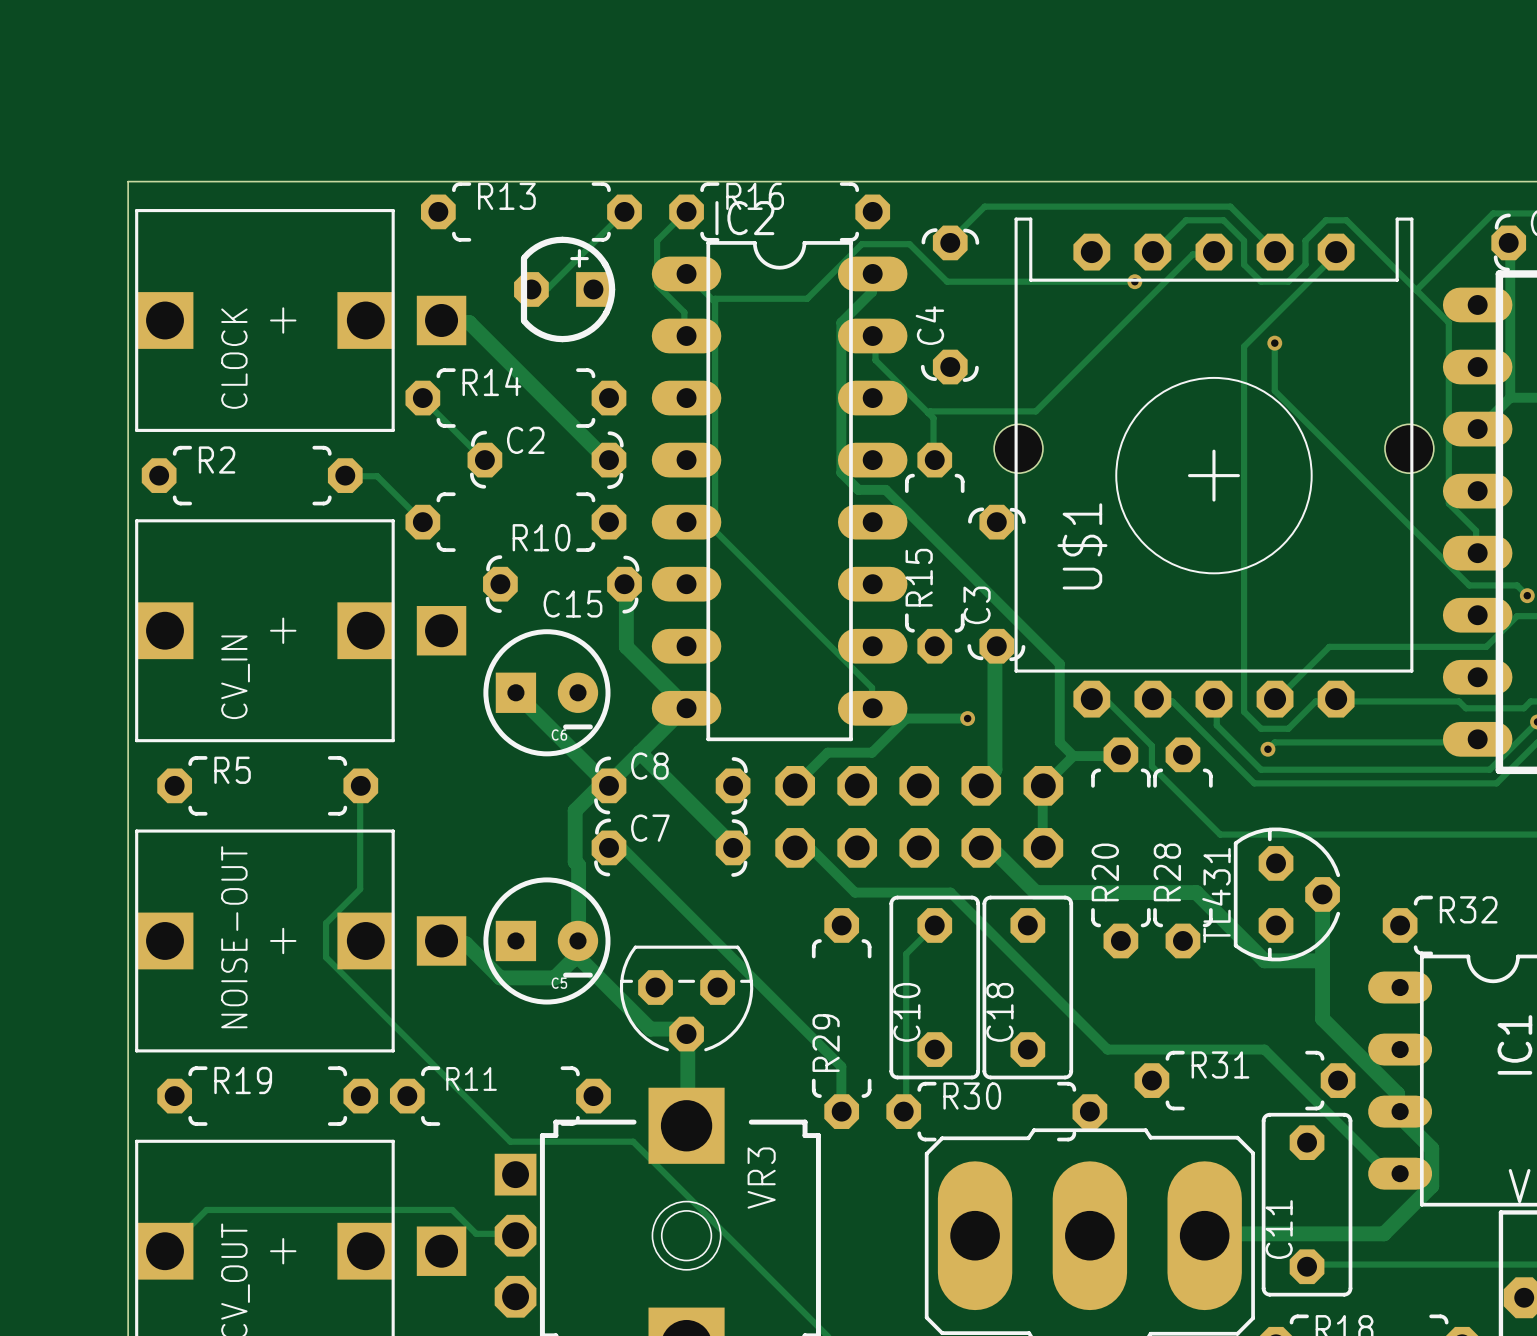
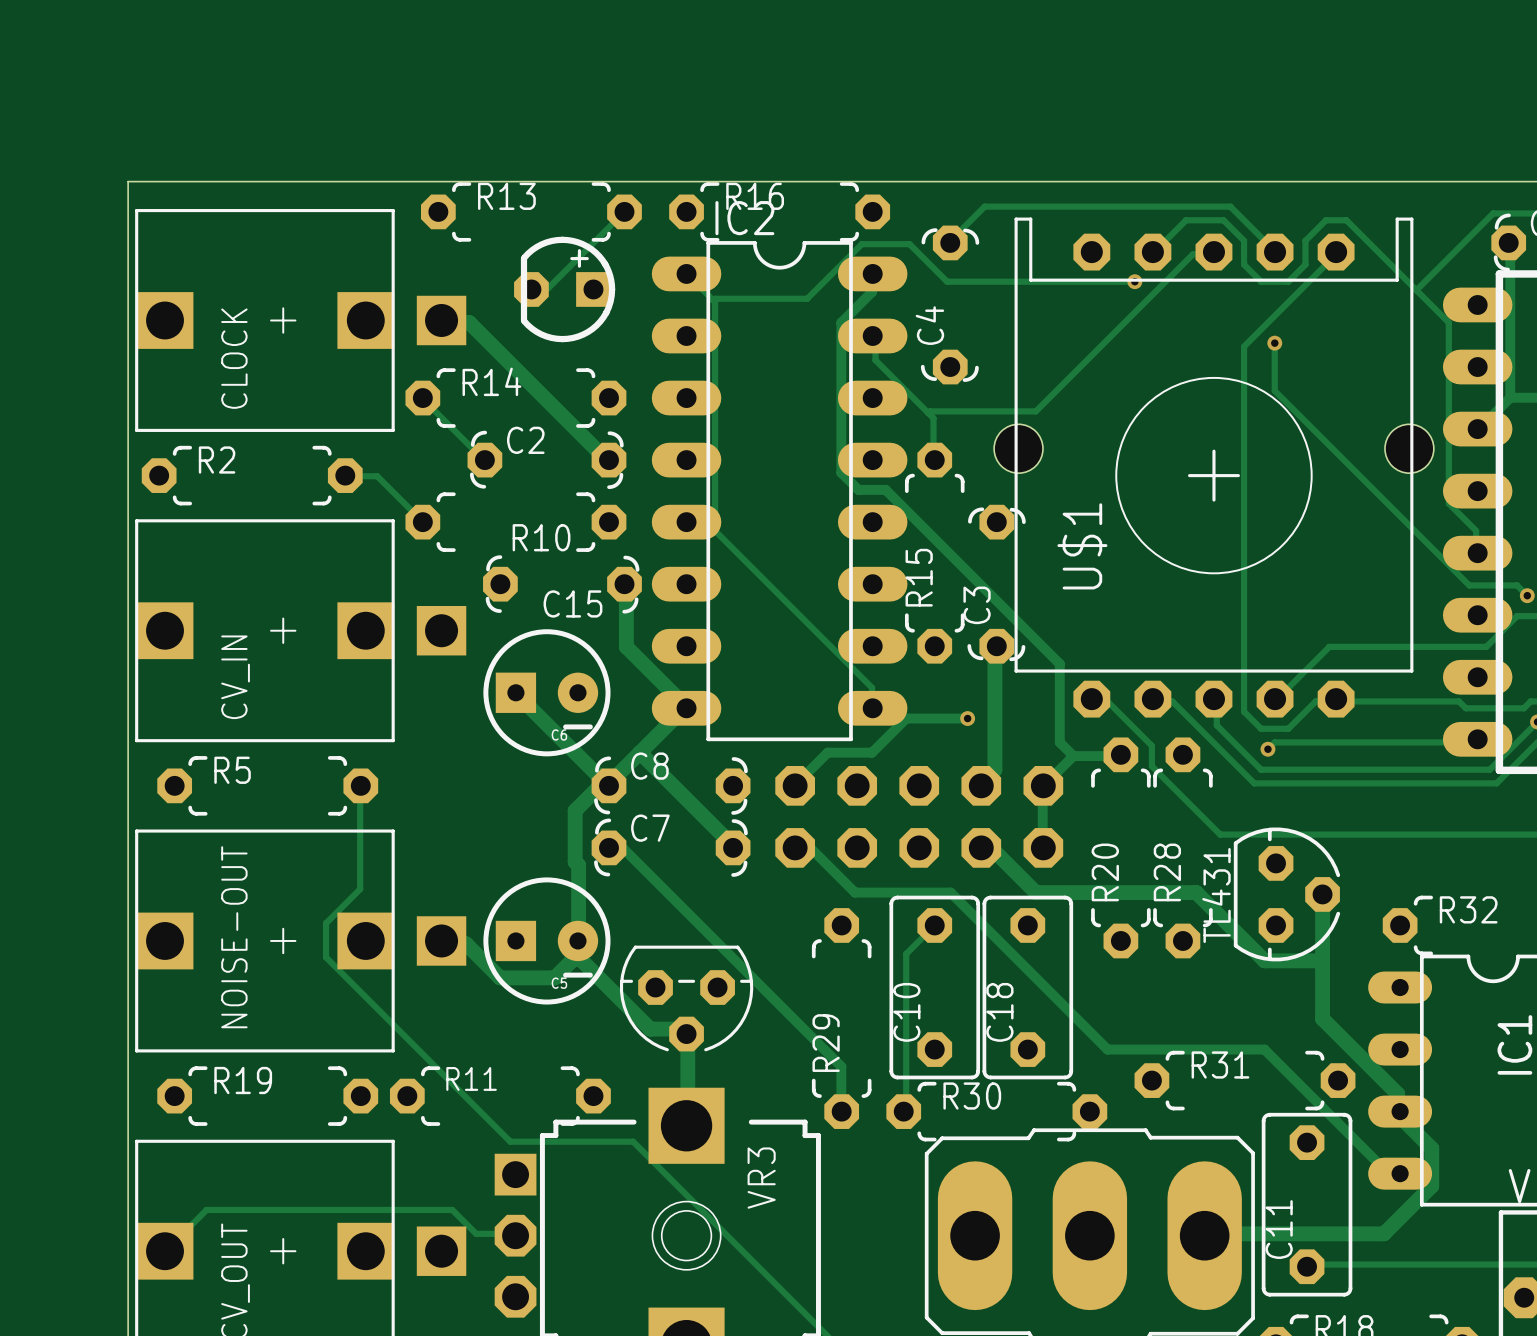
track: (686, 211) (657, 240) (657, 285) (684, 312) (684, 332) (686, 336) -> none

